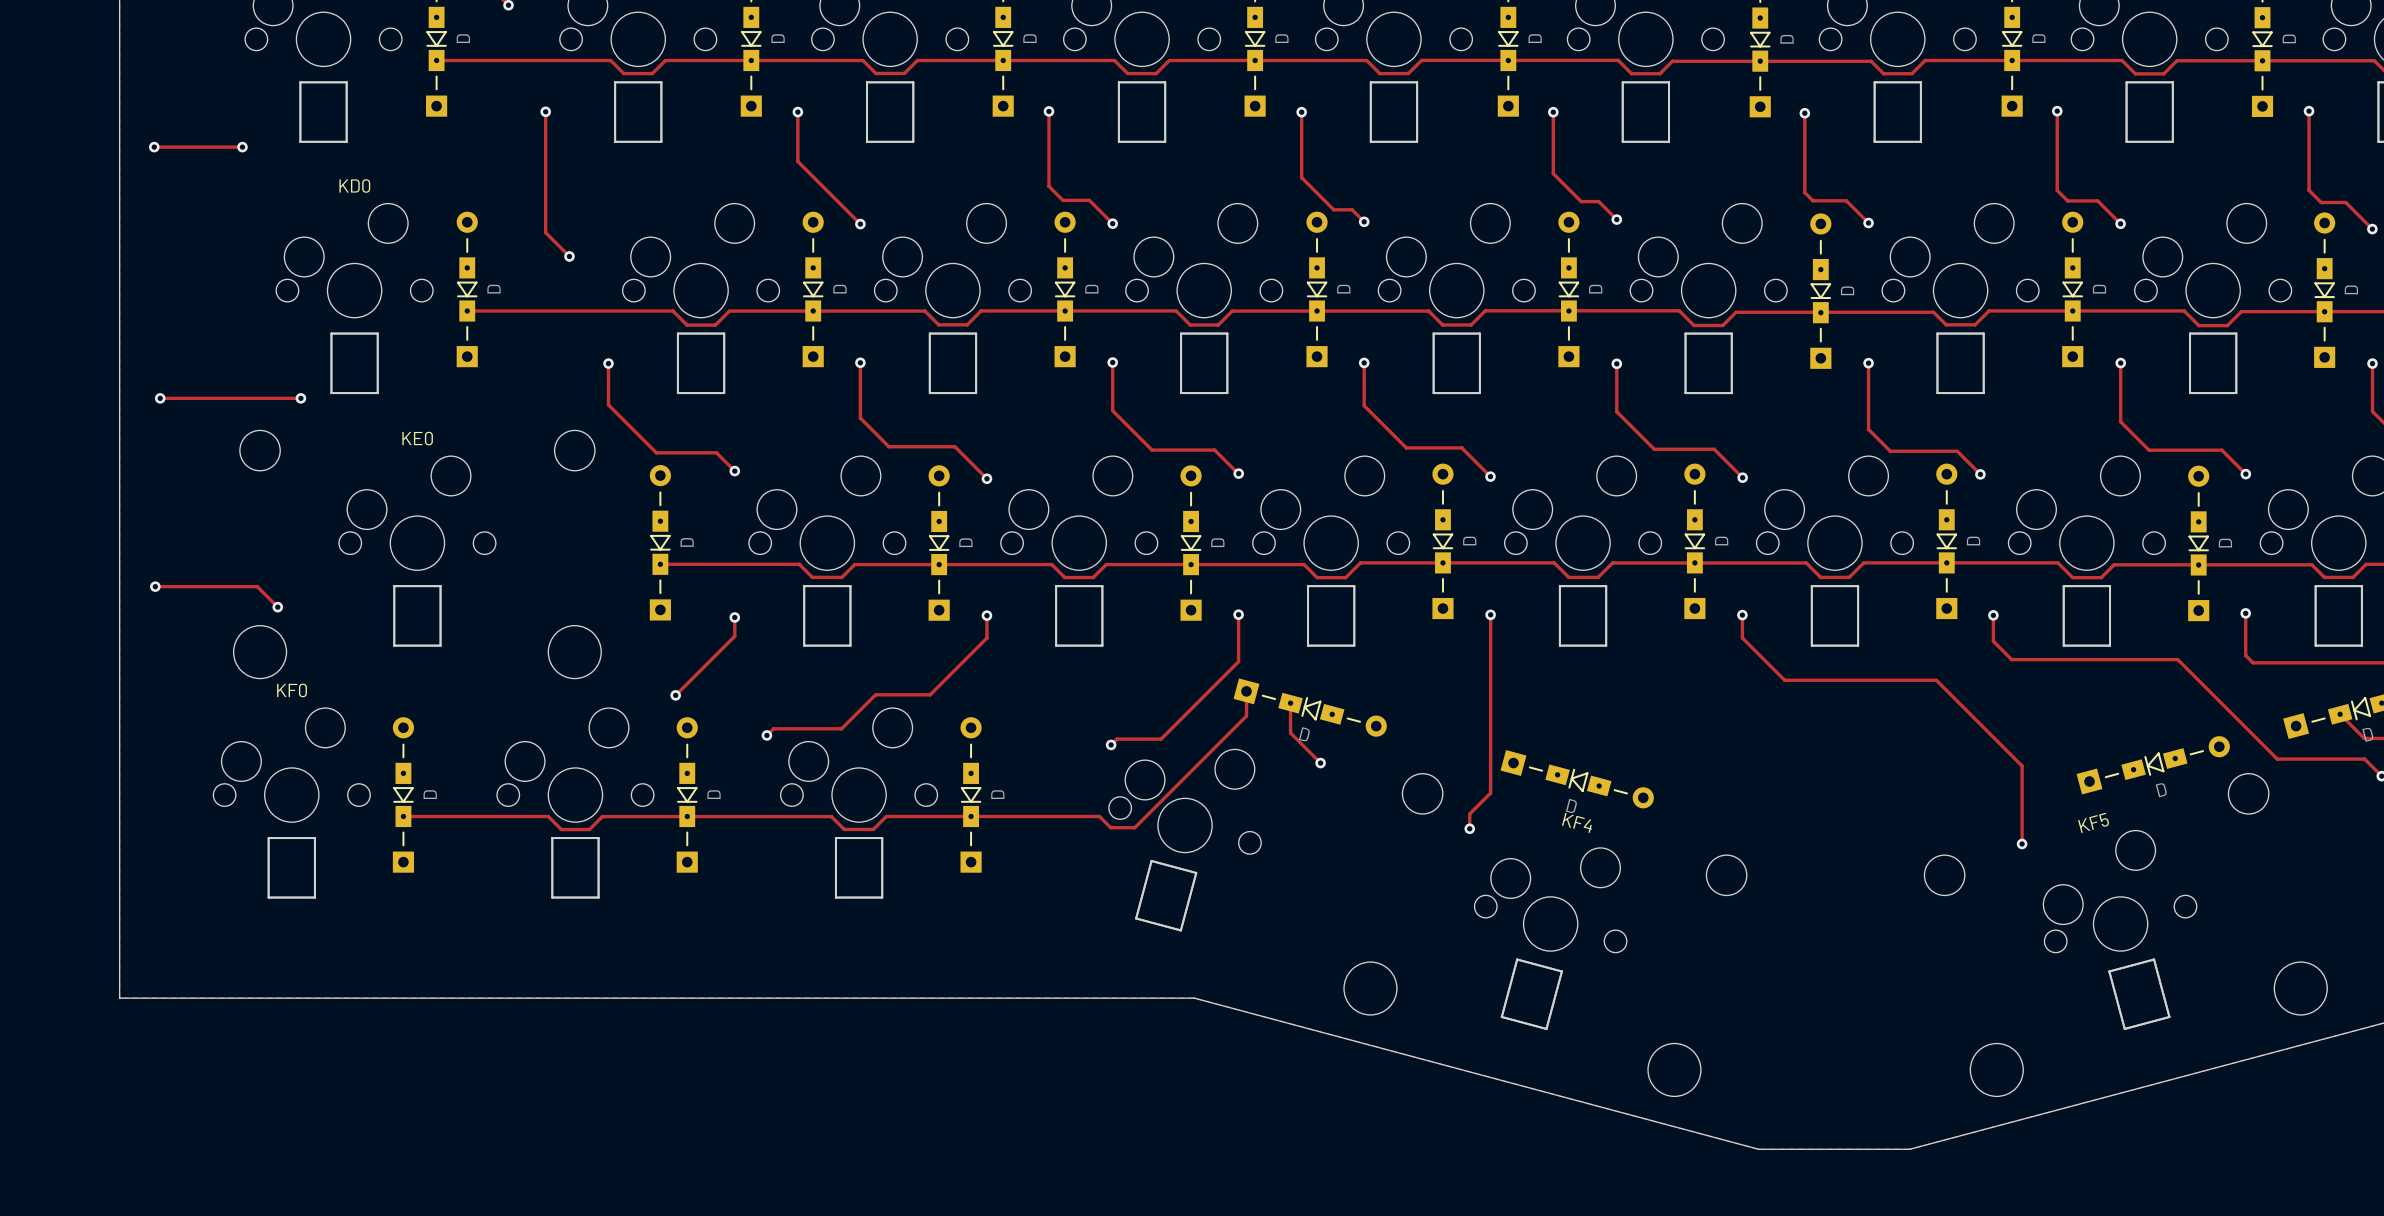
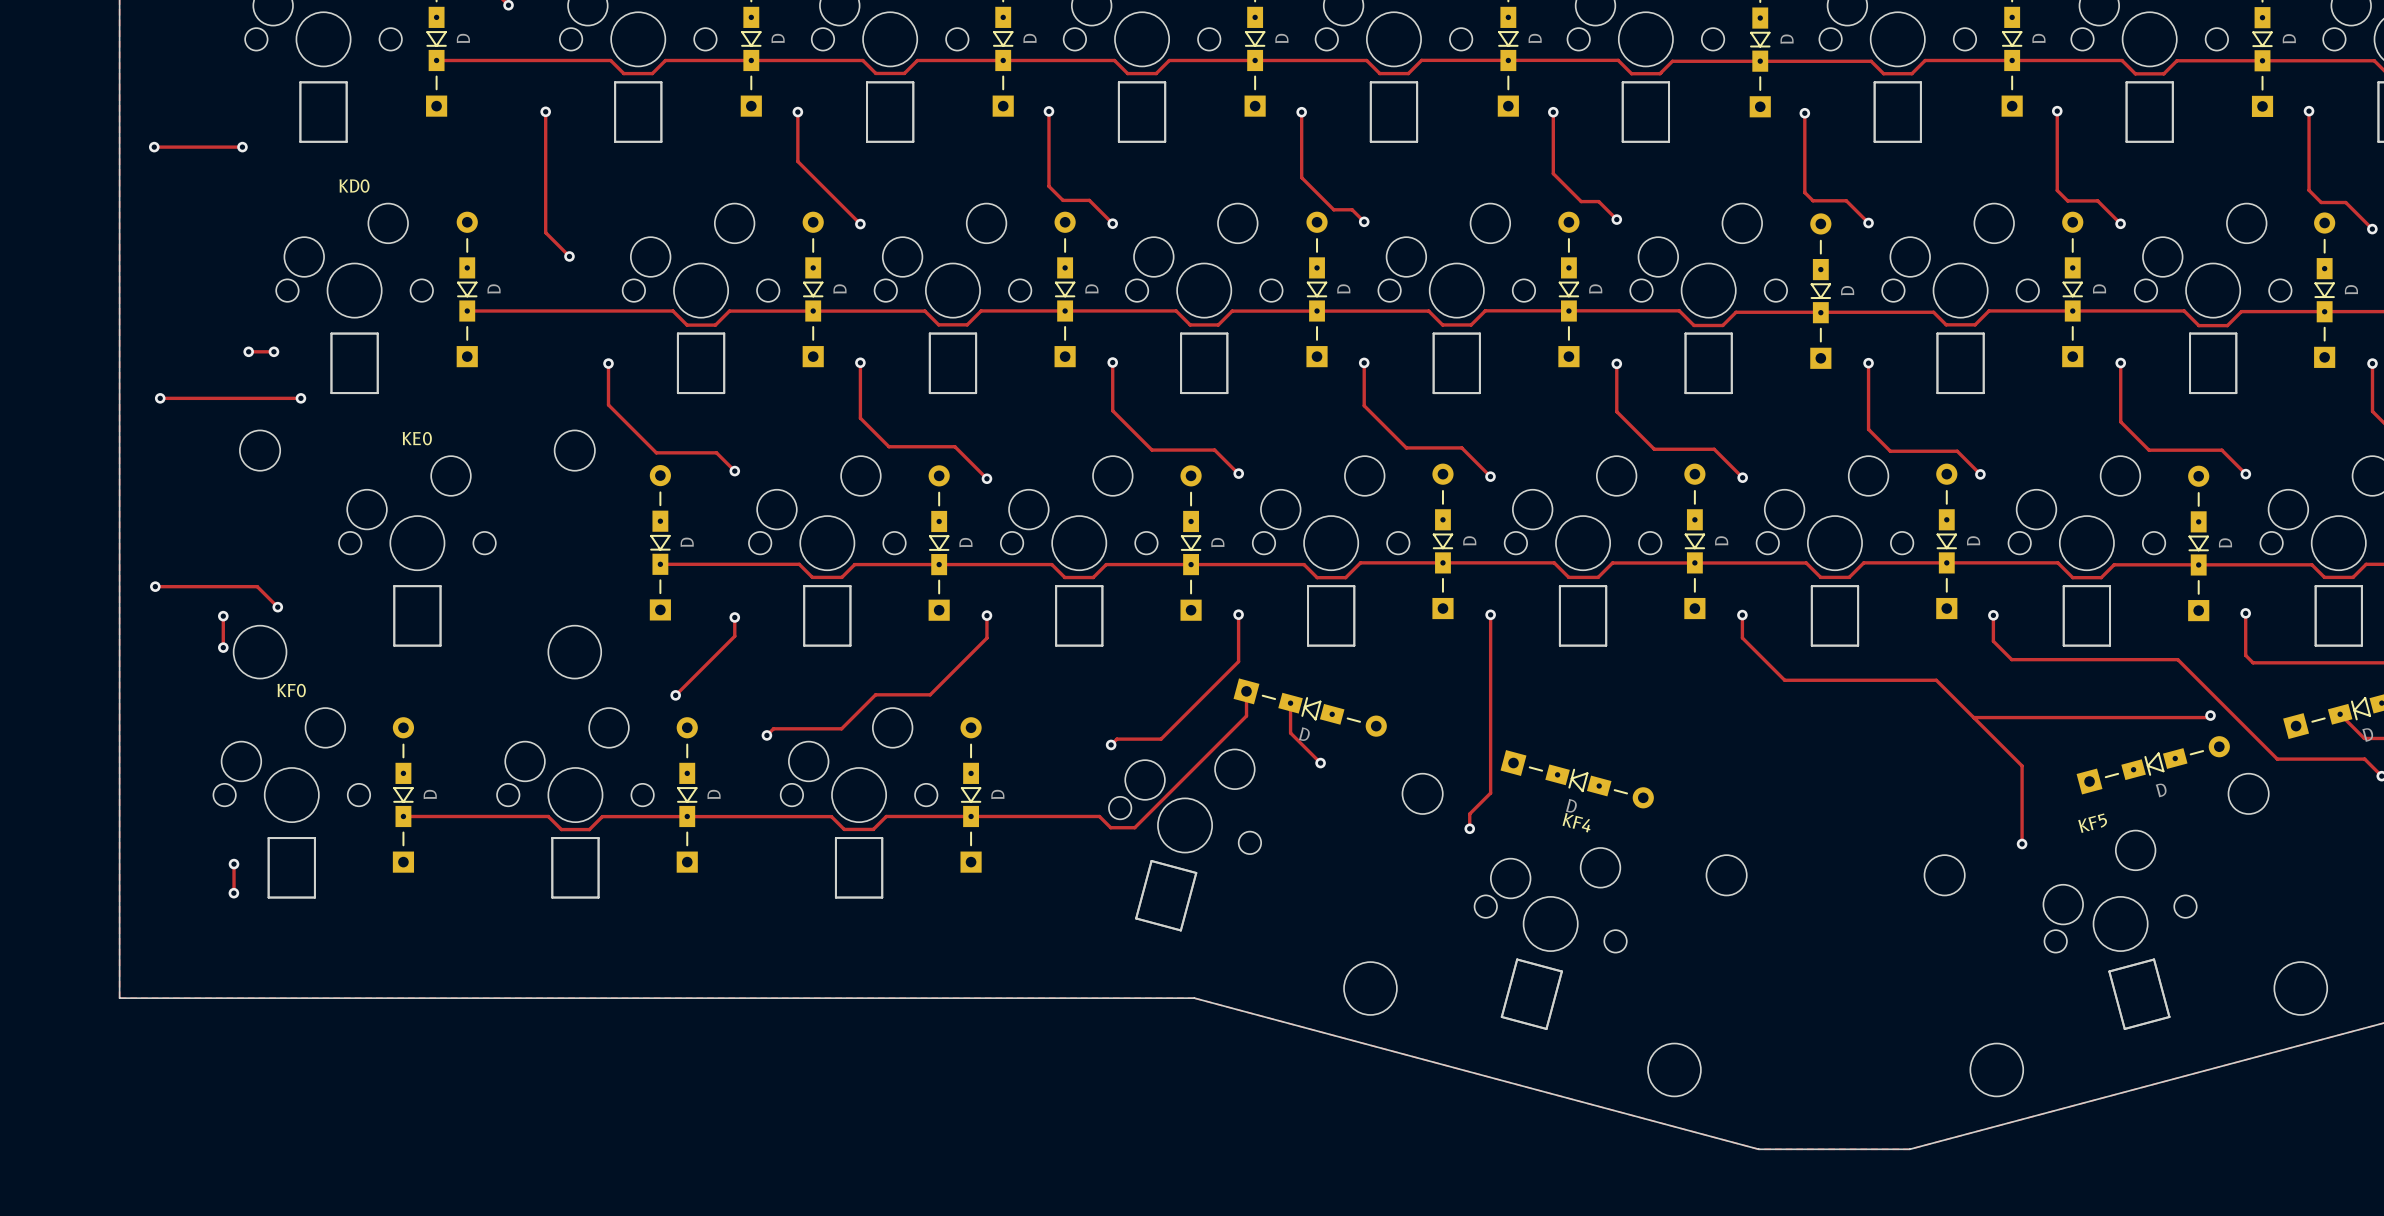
track: none -> (248, 351) (273, 351)
via: none -> (248, 351)
via: none -> (273, 351)
track: none -> (223, 616) (223, 647)
via: none -> (223, 616)
via: none -> (223, 647)
track: none -> (2210, 715) (2208, 717) (1973, 717)
via: none -> (2210, 715)
track: none -> (234, 864) (234, 893)
via: none -> (234, 864)
via: none -> (233, 893)

